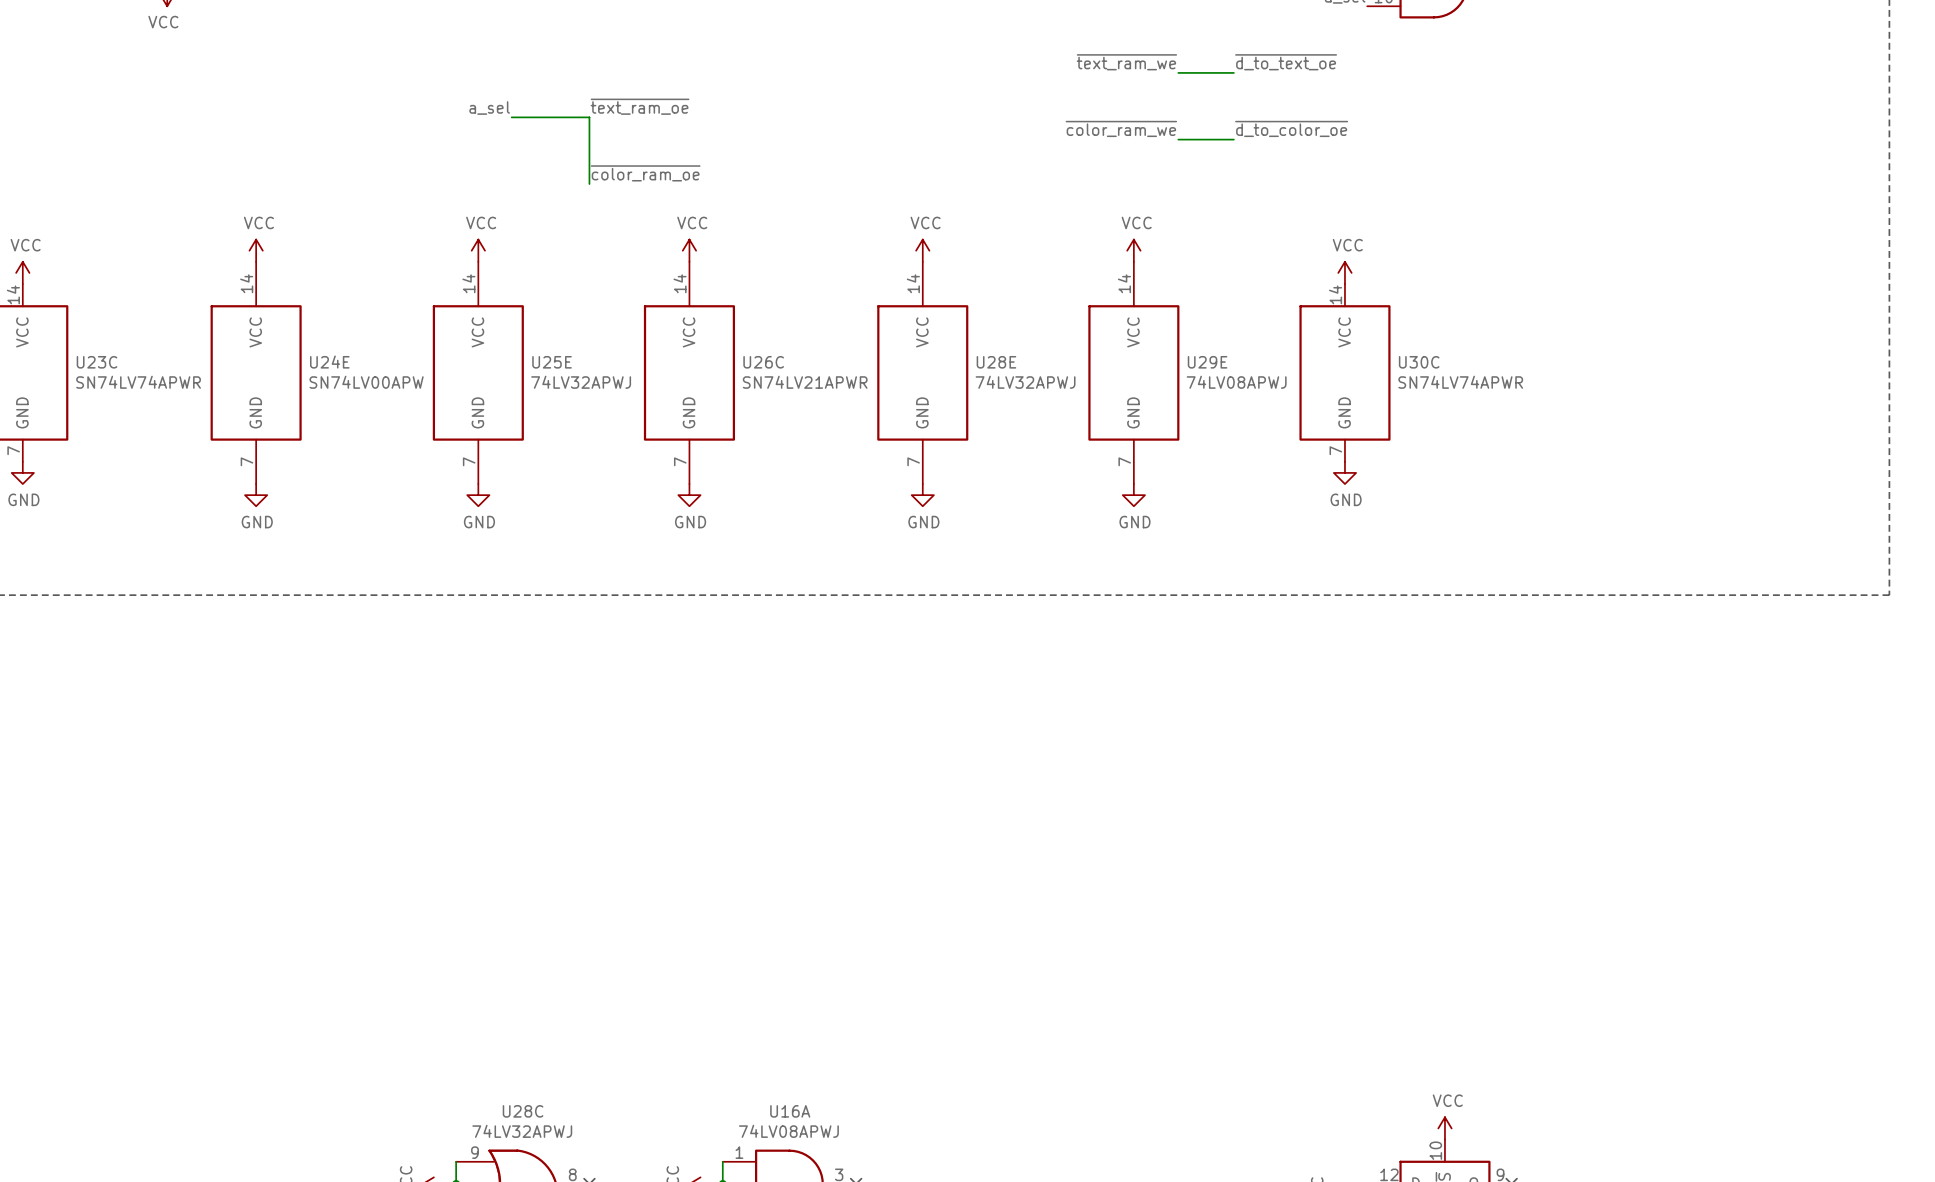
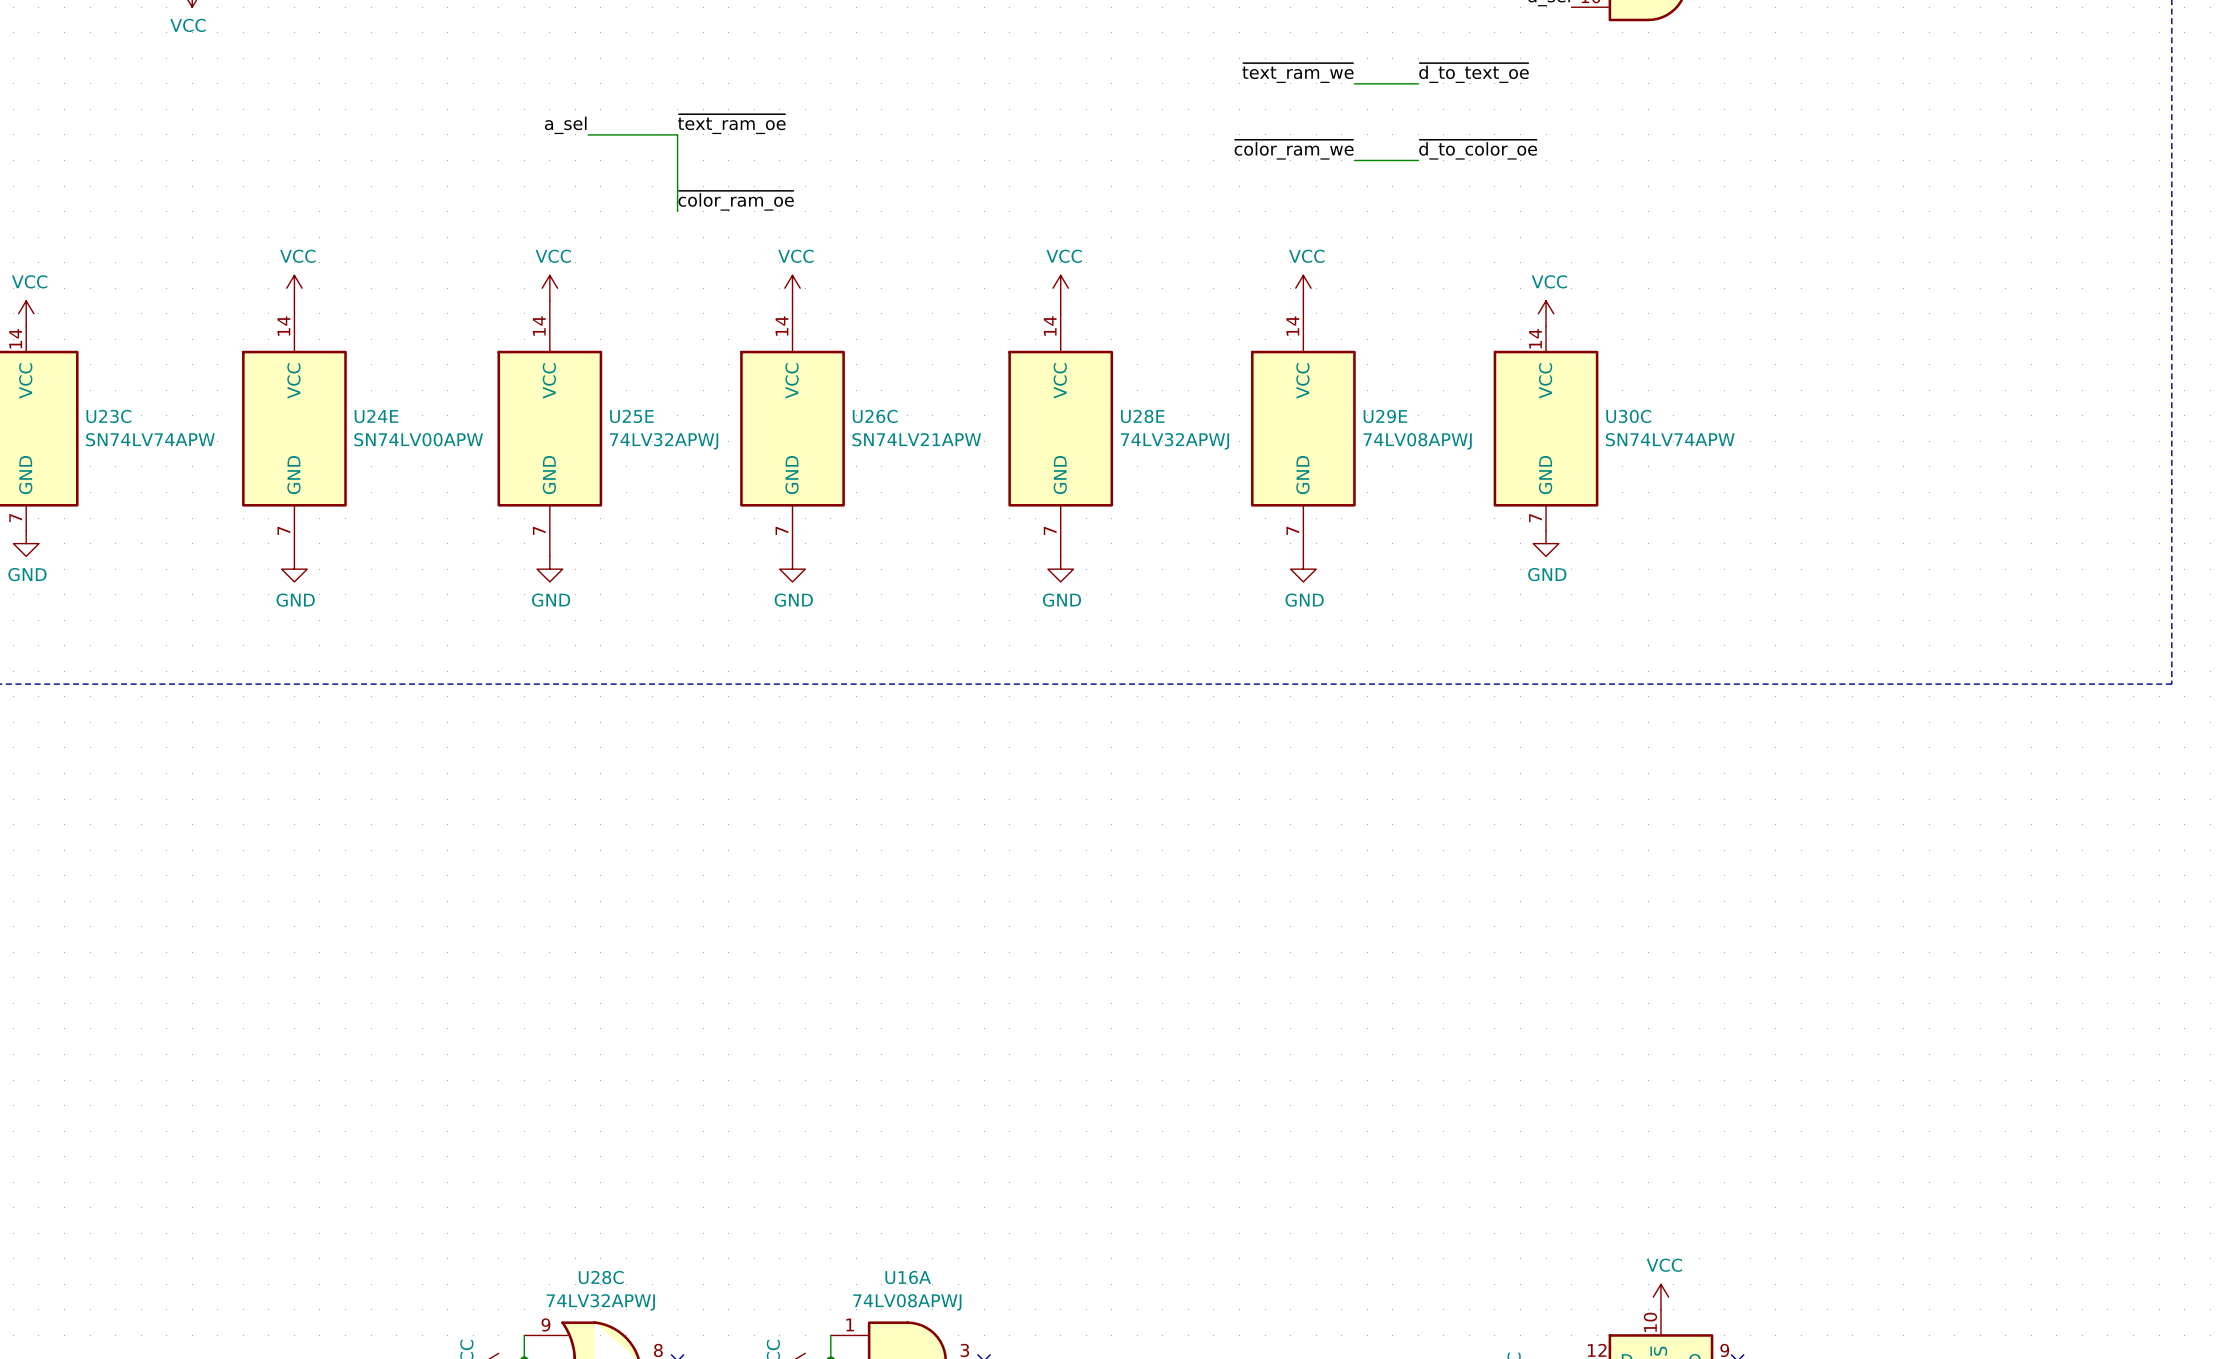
U23C value: SN74LV74APWR (138, 382) -> SN74LV74APW (150, 439)
U26C value: SN74LV21APWR (805, 382) -> SN74LV21APW (916, 439)
U30C value: SN74LV74APWR (1460, 382) -> SN74LV74APW (1670, 439)

